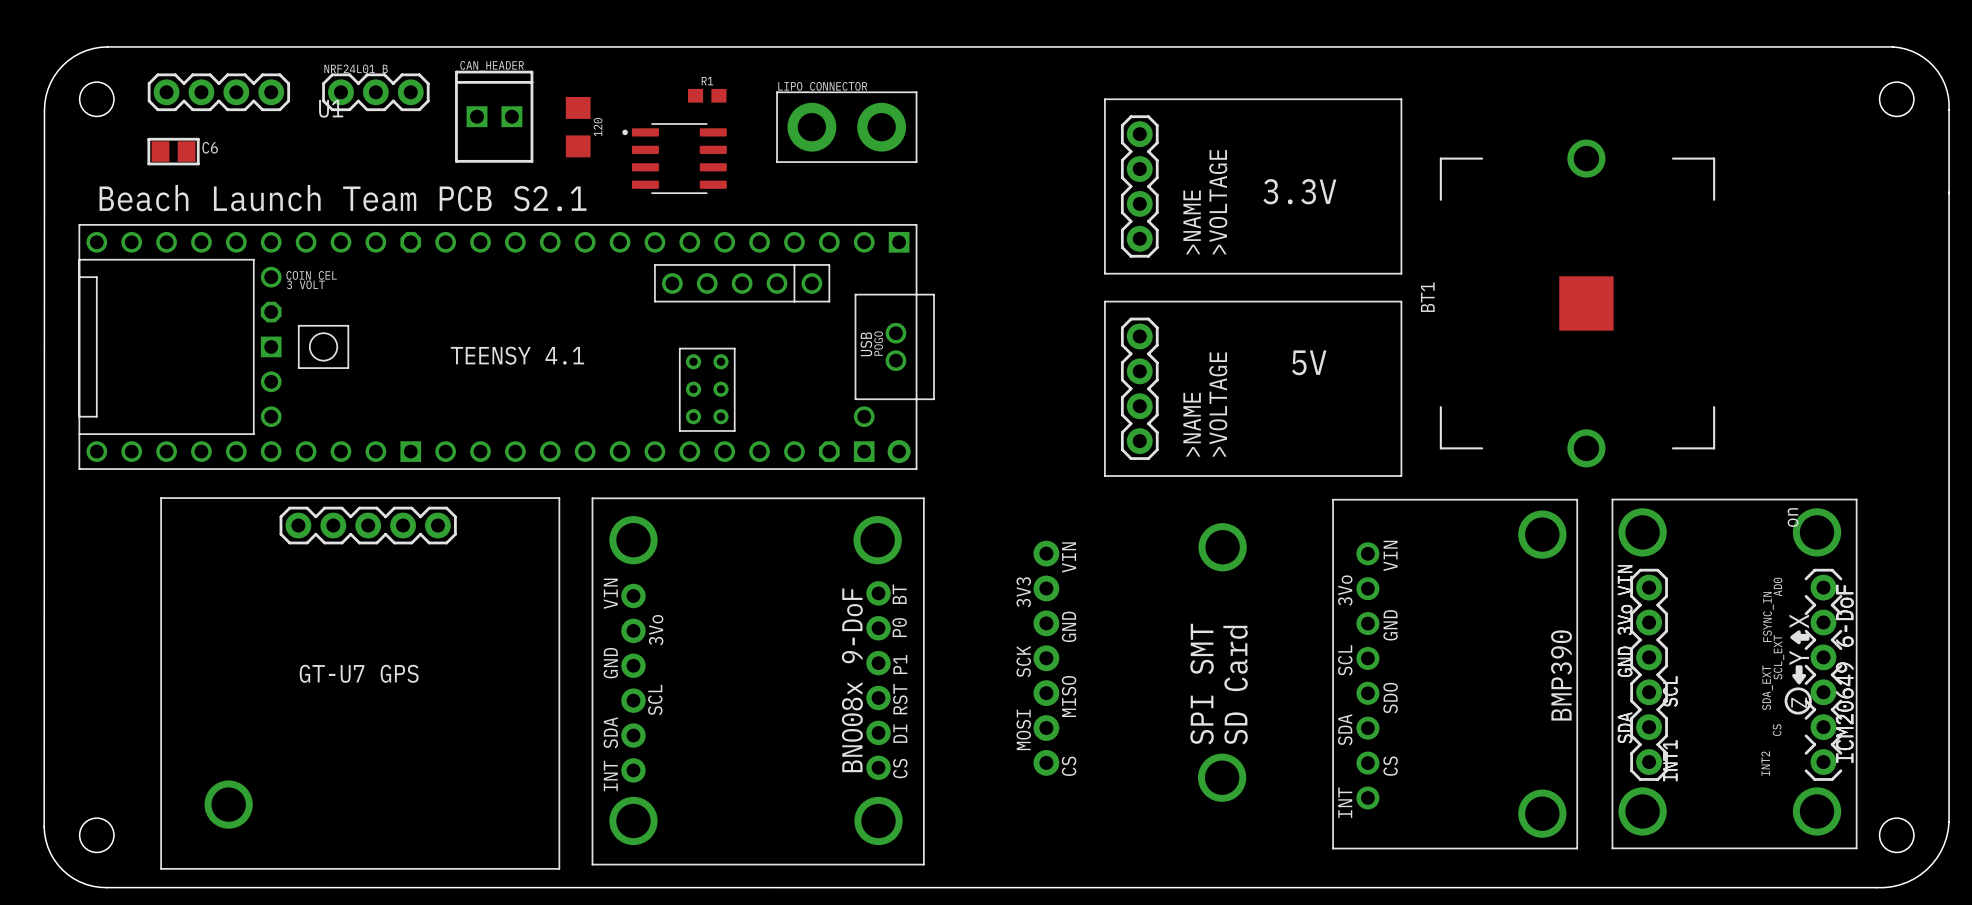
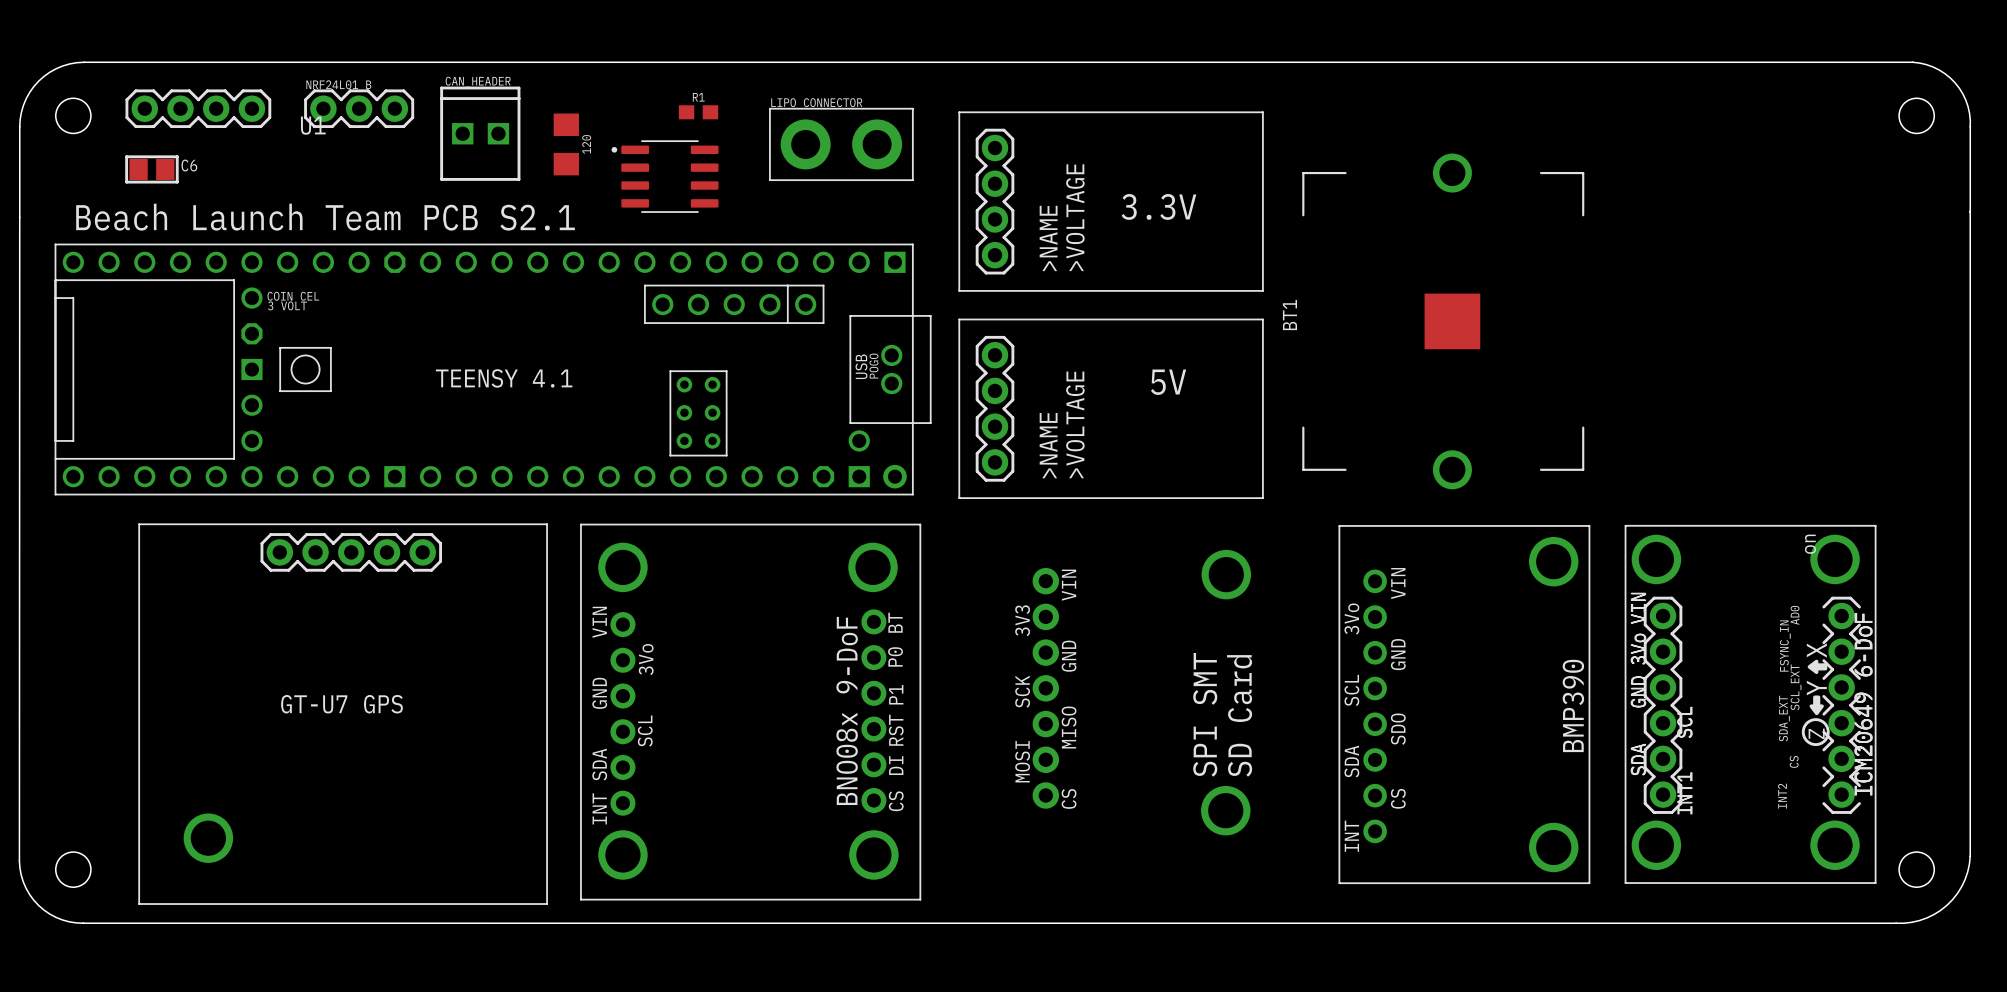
part: none -> (1111, 201)
part: (1253, 186) -> none
text position: 3.3V (1299, 191) -> 3.3V (1158, 206)
BT1 position: (1577, 303) -> (1443, 321)
text position: 5V (1309, 362) -> 5V (1168, 382)
part: none -> (1111, 408)
part: (1253, 388) -> none

